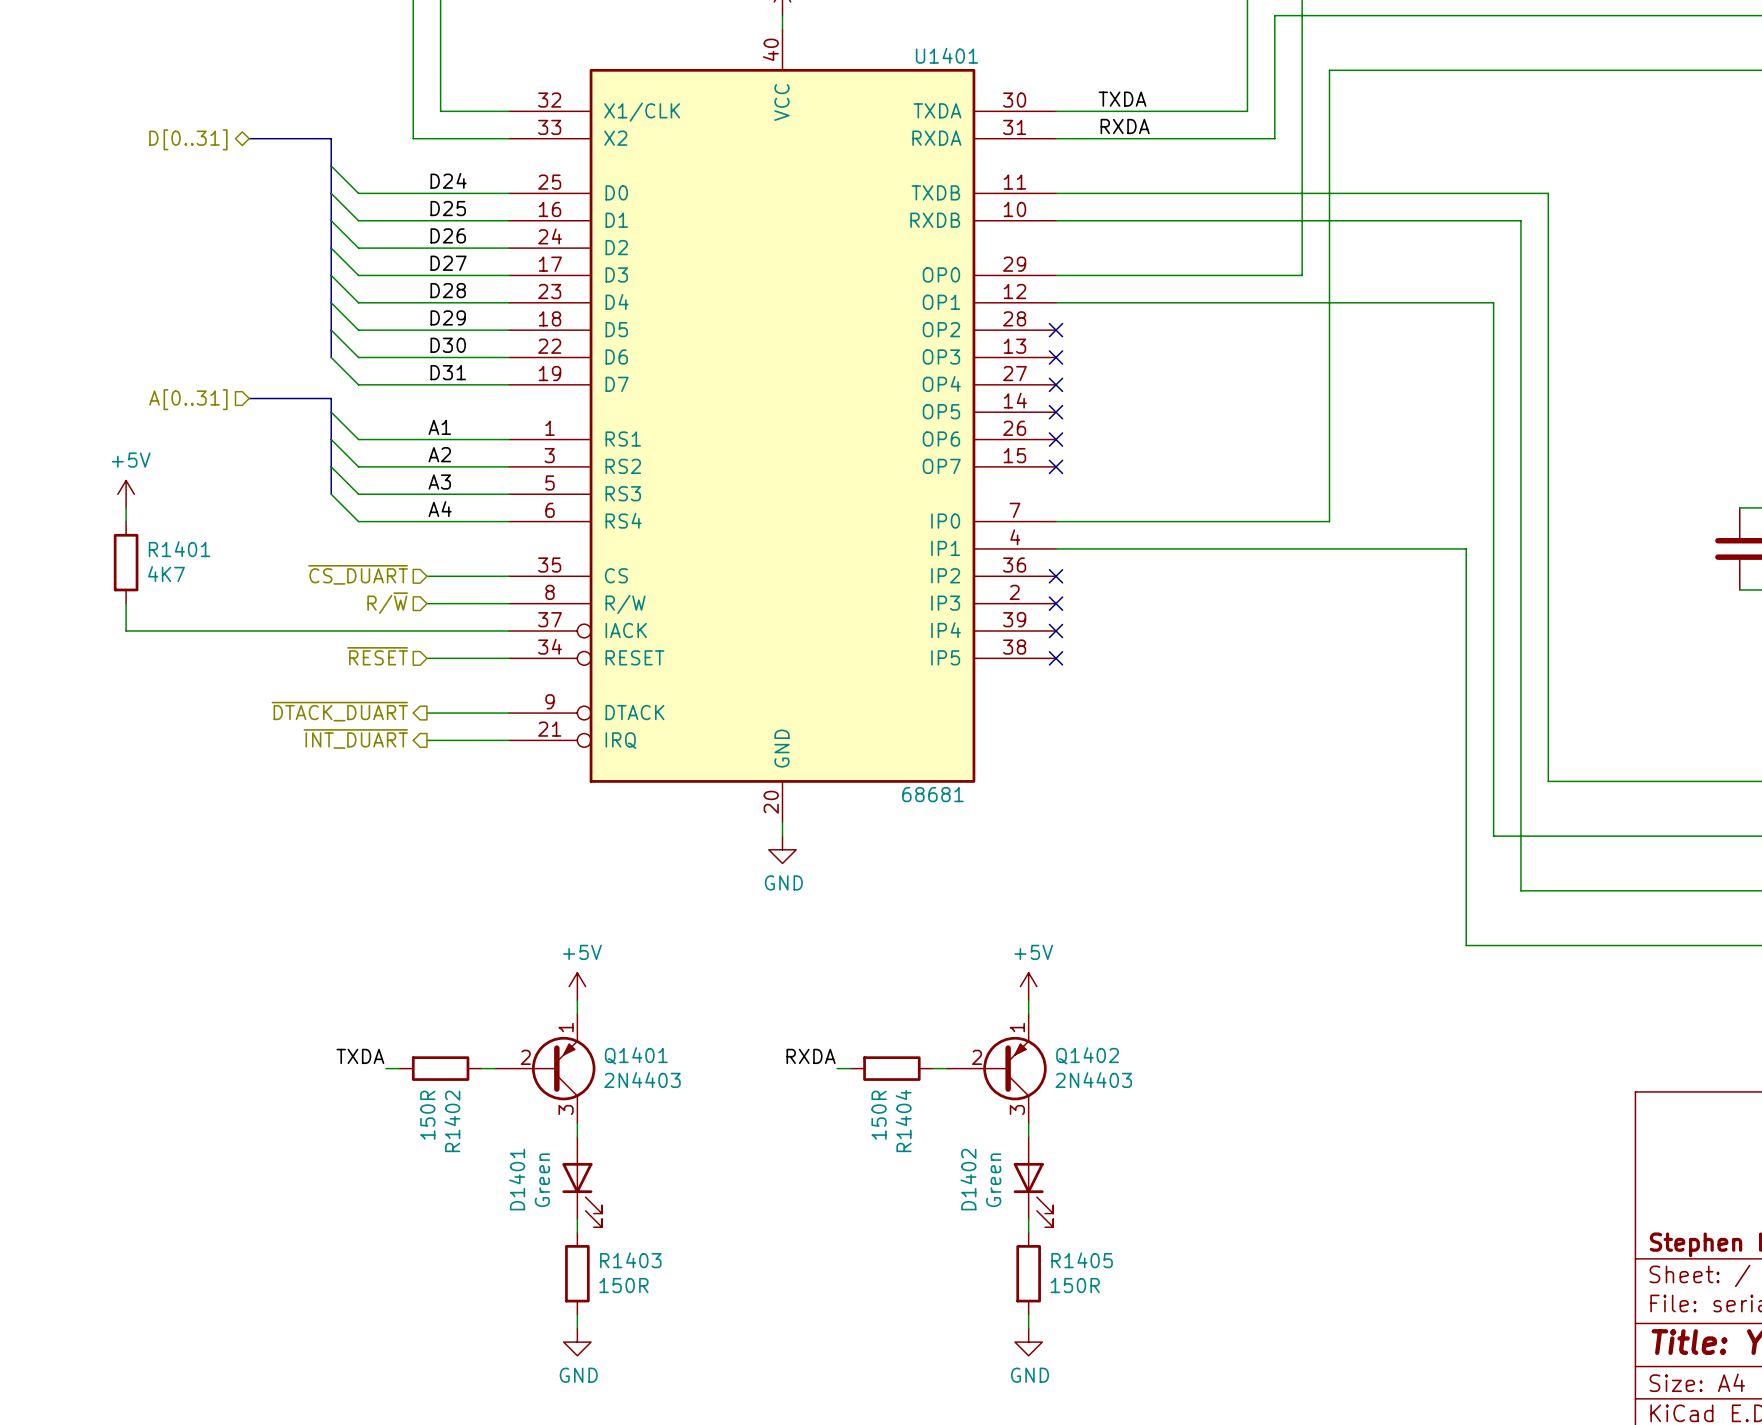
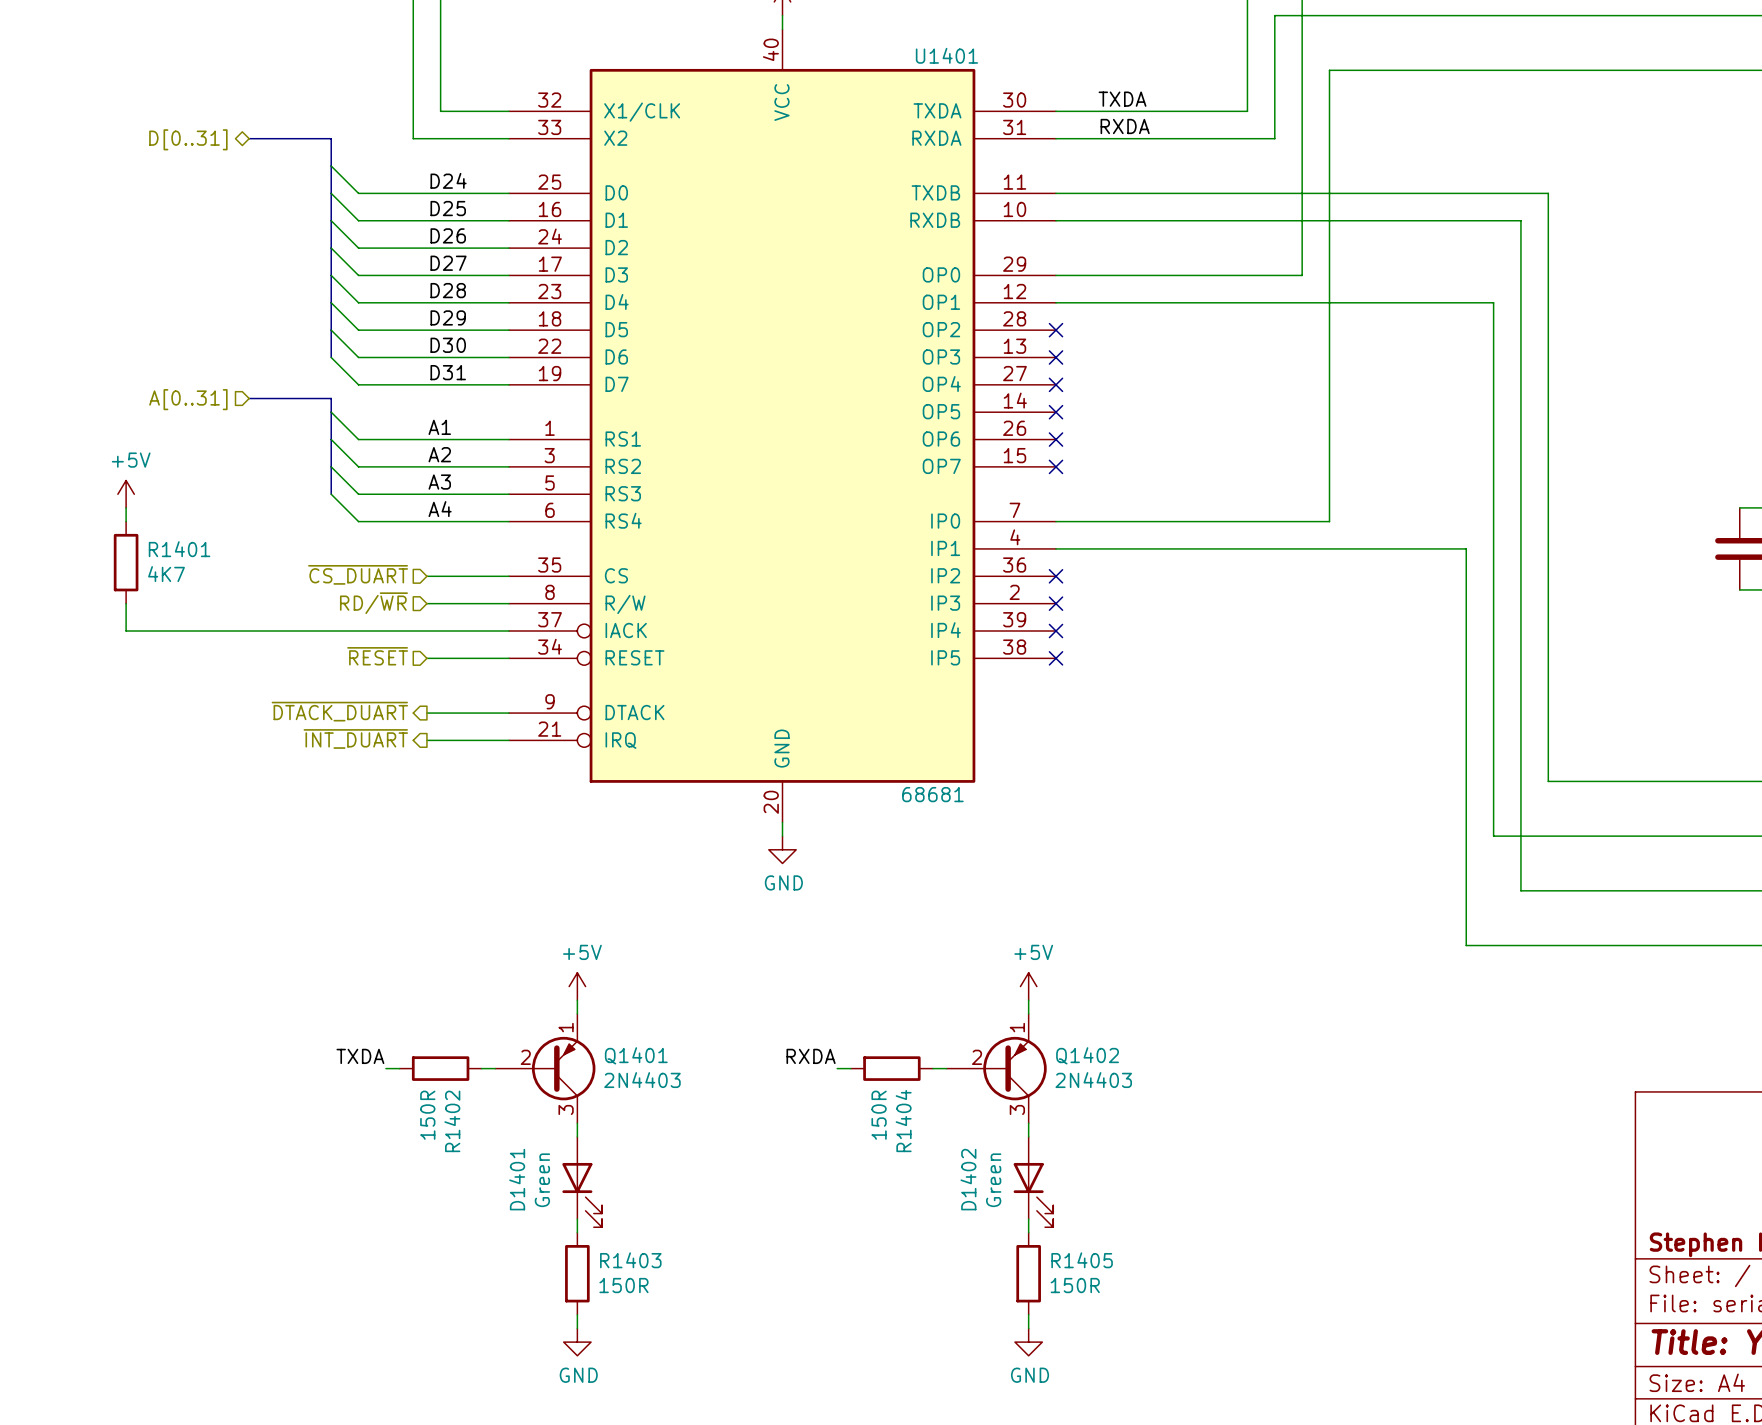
hierarchical label: R/~{W} (387, 603) -> RD/~{WR} (373, 603)

